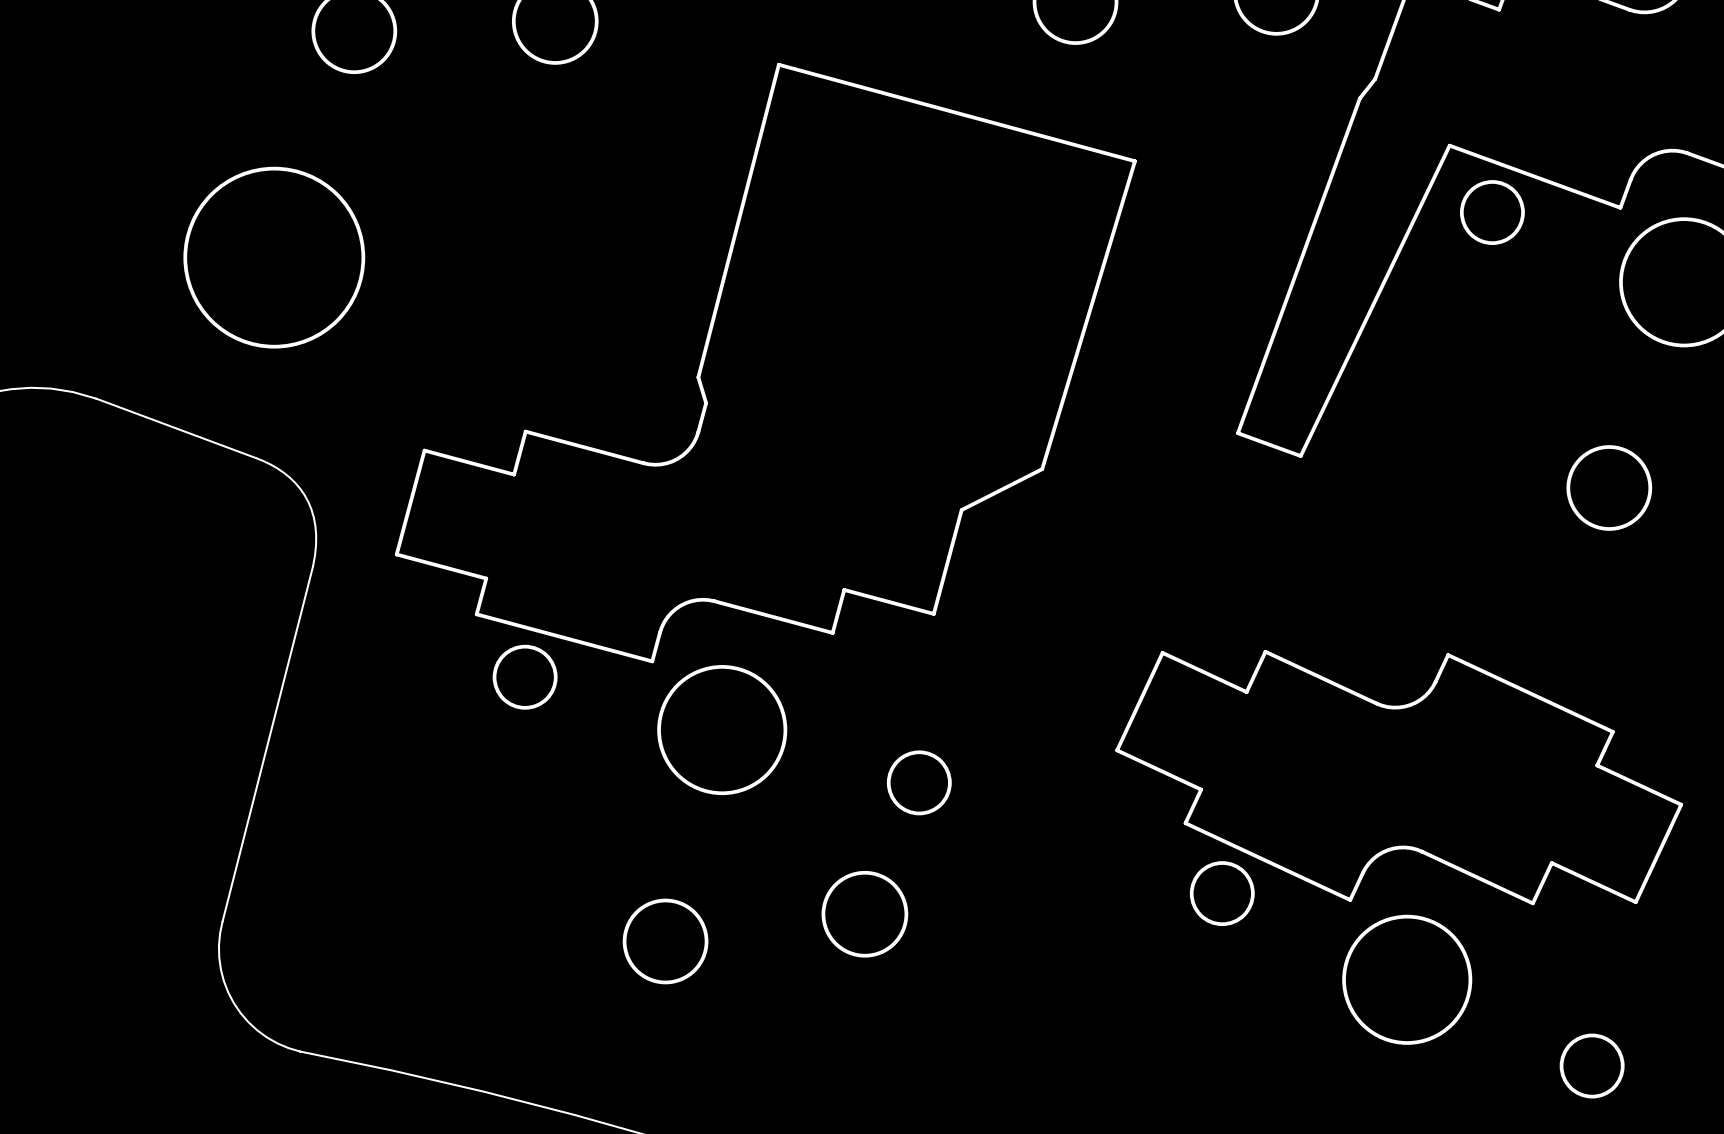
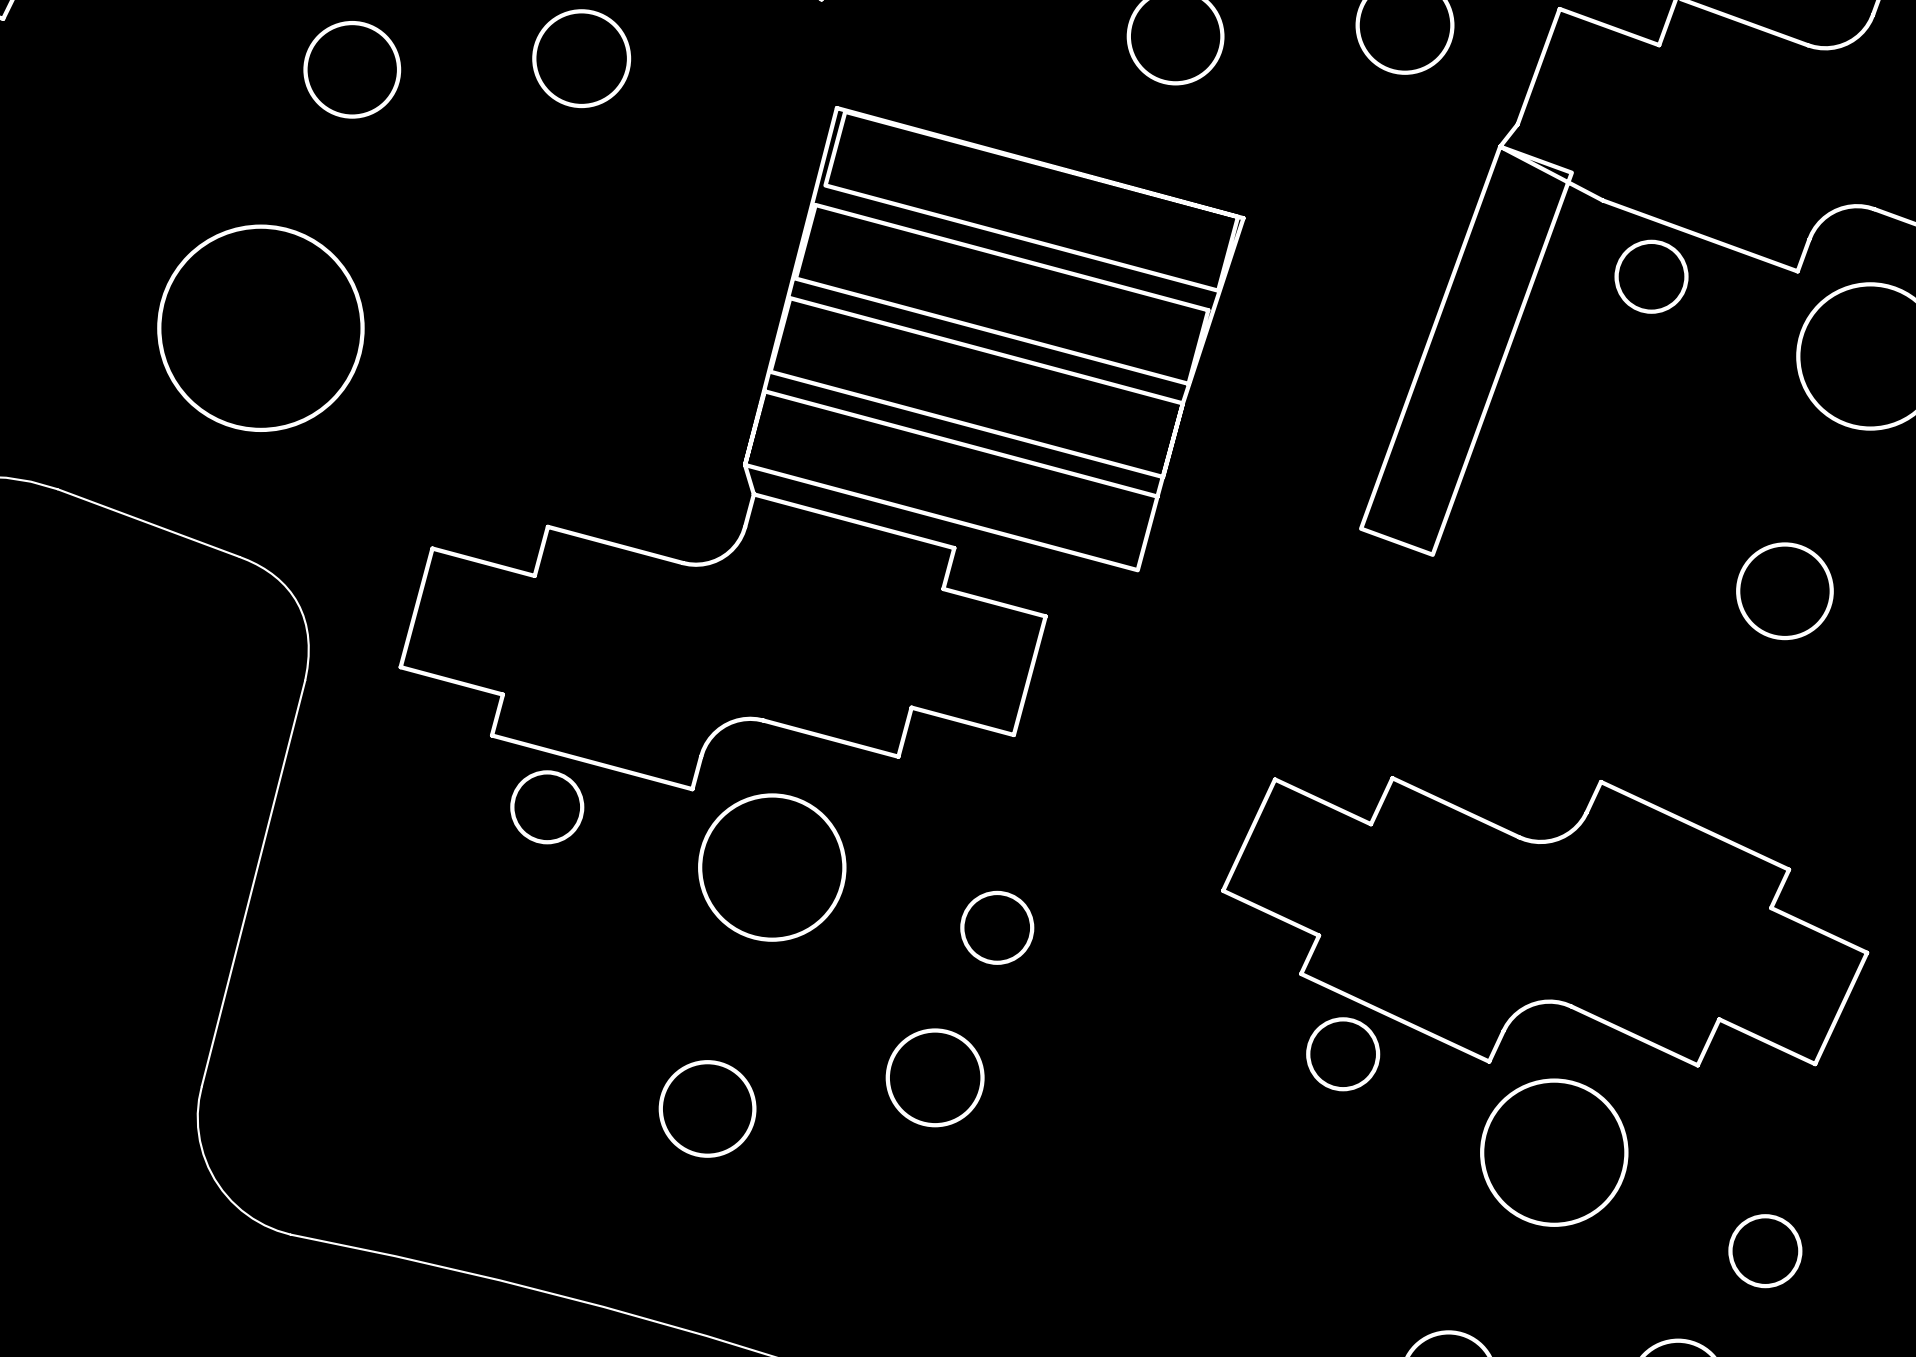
drawing: none -> [742, 109, 1241, 573]
drawing: none -> [1359, 144, 1574, 557]
board edge: (1359, 98) (1237, 433) (1300, 456) (1449, 145) -> (1500, 146) (1602, 200)
board edge: (1134, 161) (1042, 469) (961, 510) -> (1243, 218) (1182, 403) (1157, 496)
drawing shape: [394, 401, 964, 985] -> [398, 492, 1048, 1158]

